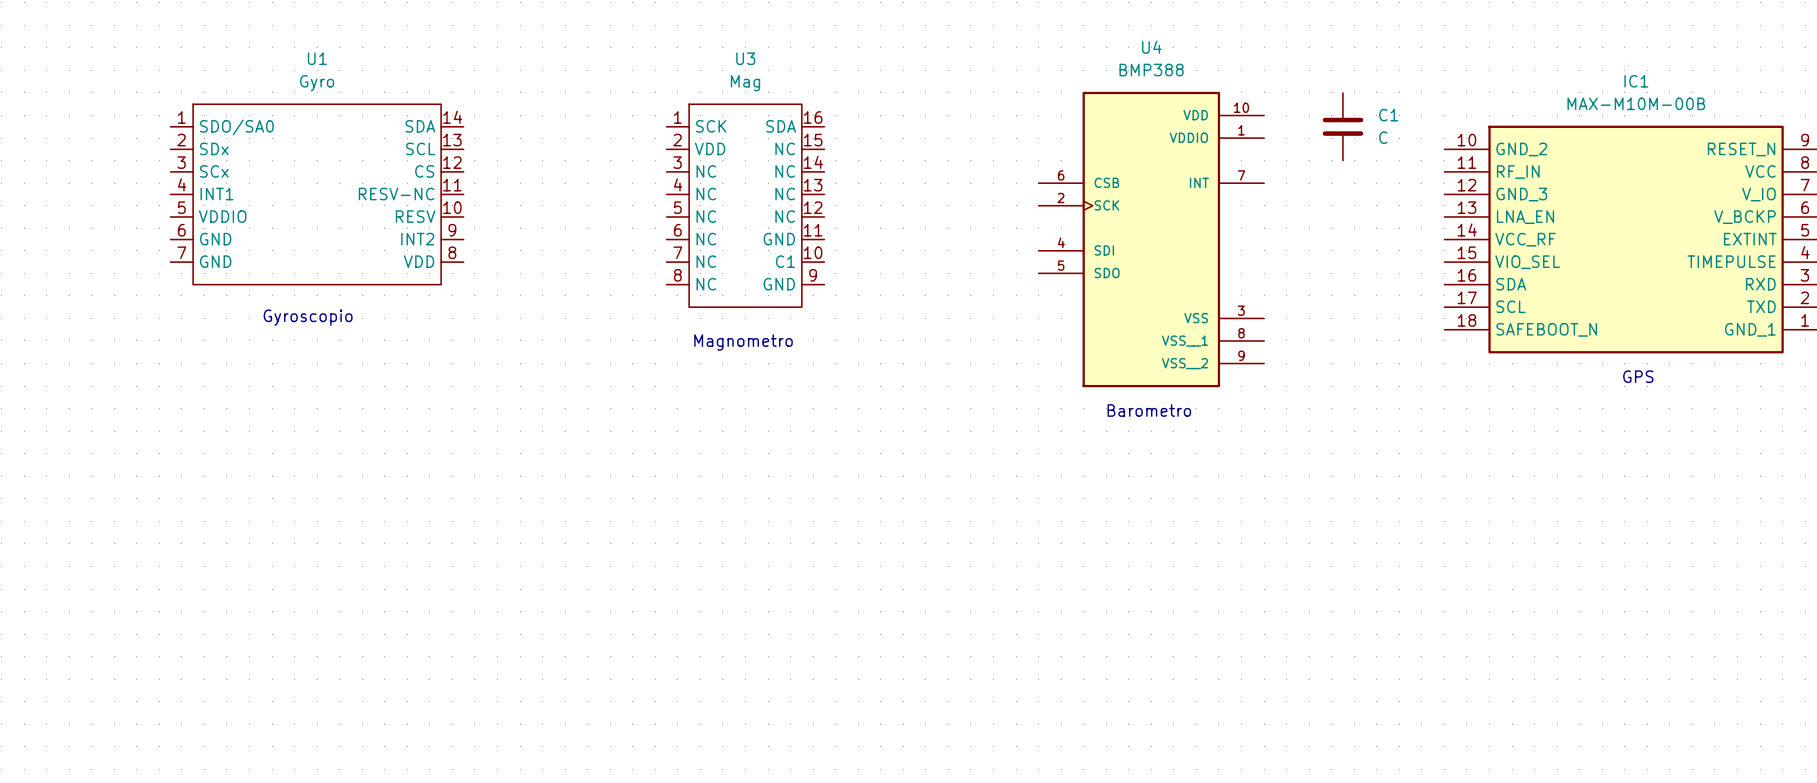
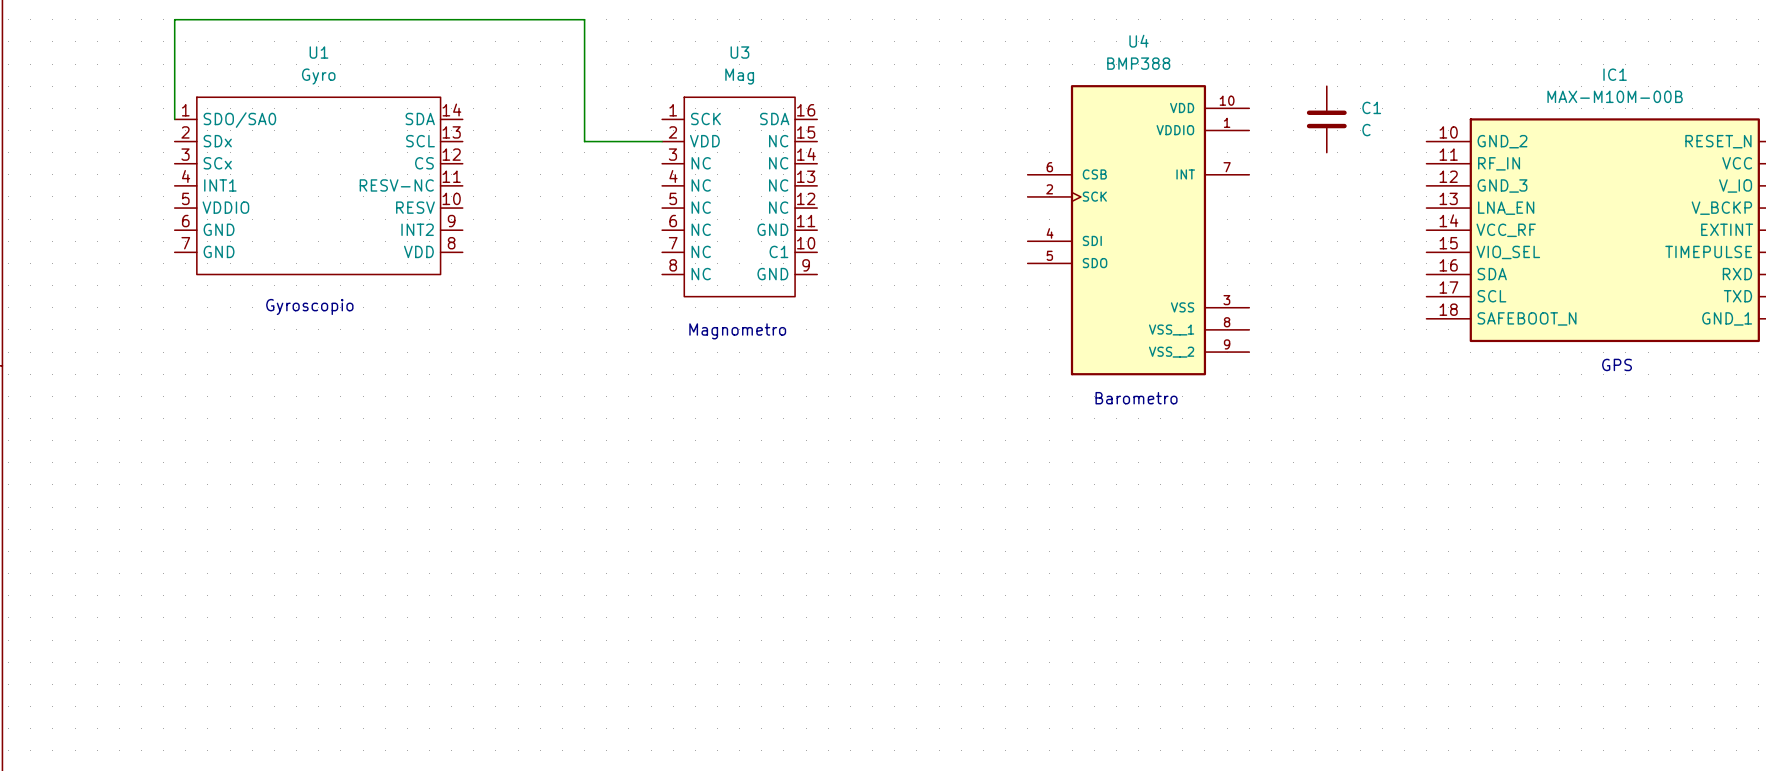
wire: none -> (174, 119) (174, 19) (584, 19) (584, 141) (662, 141)

